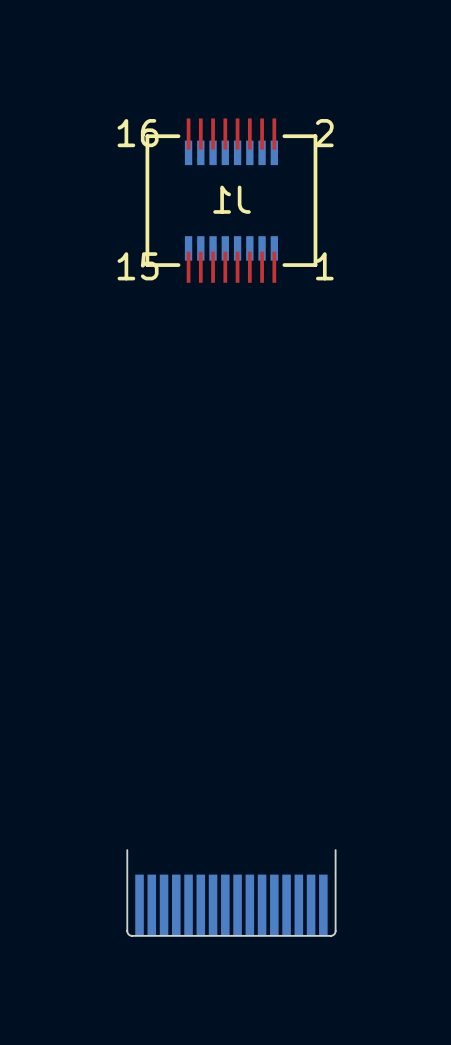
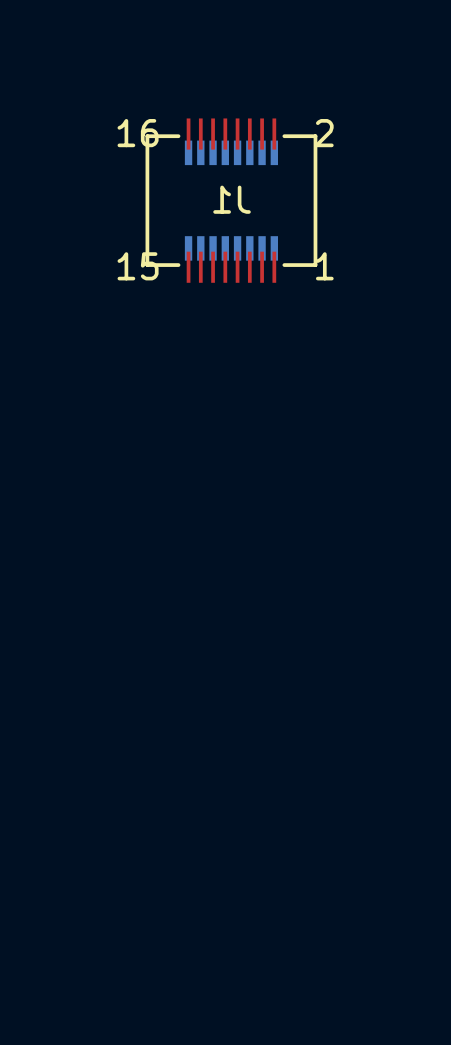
part: (231, 892) -> none

